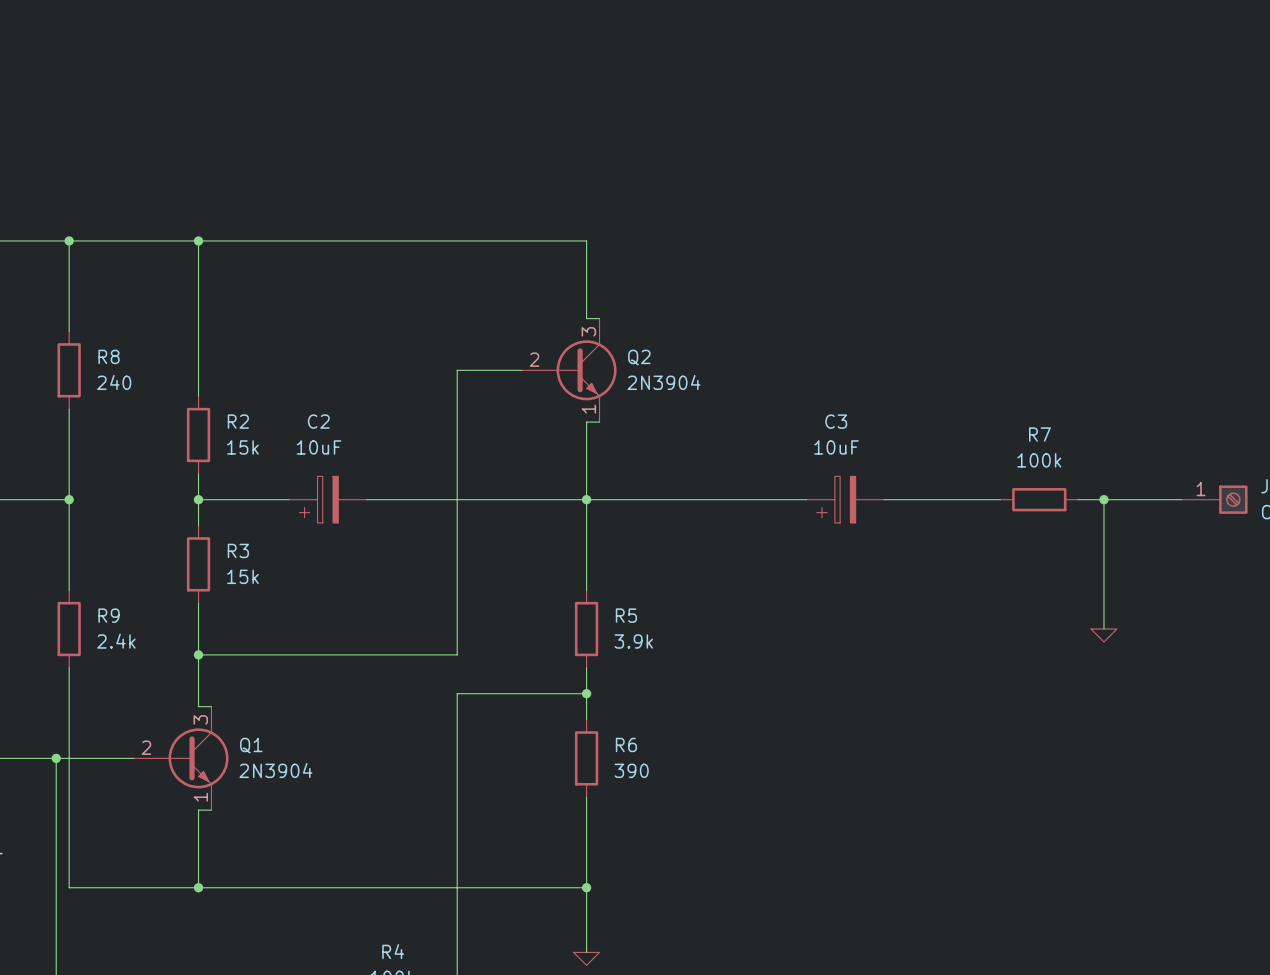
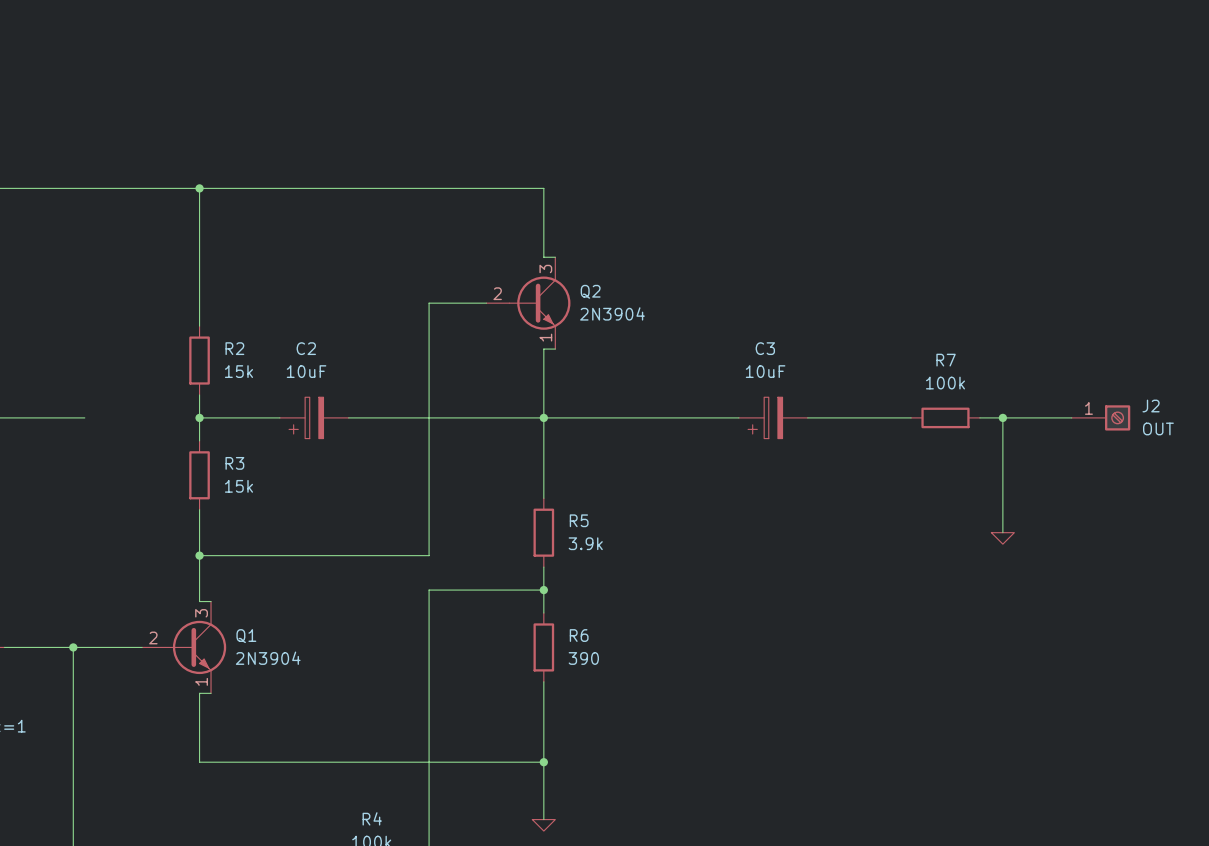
wire: (69, 240) (69, 331) -> none
junction: (69, 240) -> none
R8: 240 (69, 370) -> none
wire: (69, 409) (69, 590) -> none
junction: (69, 499) -> none
R9: 2.4k (69, 629) -> none
wire: (69, 667) (69, 887) (198, 887) -> none
junction: (198, 887) -> none

